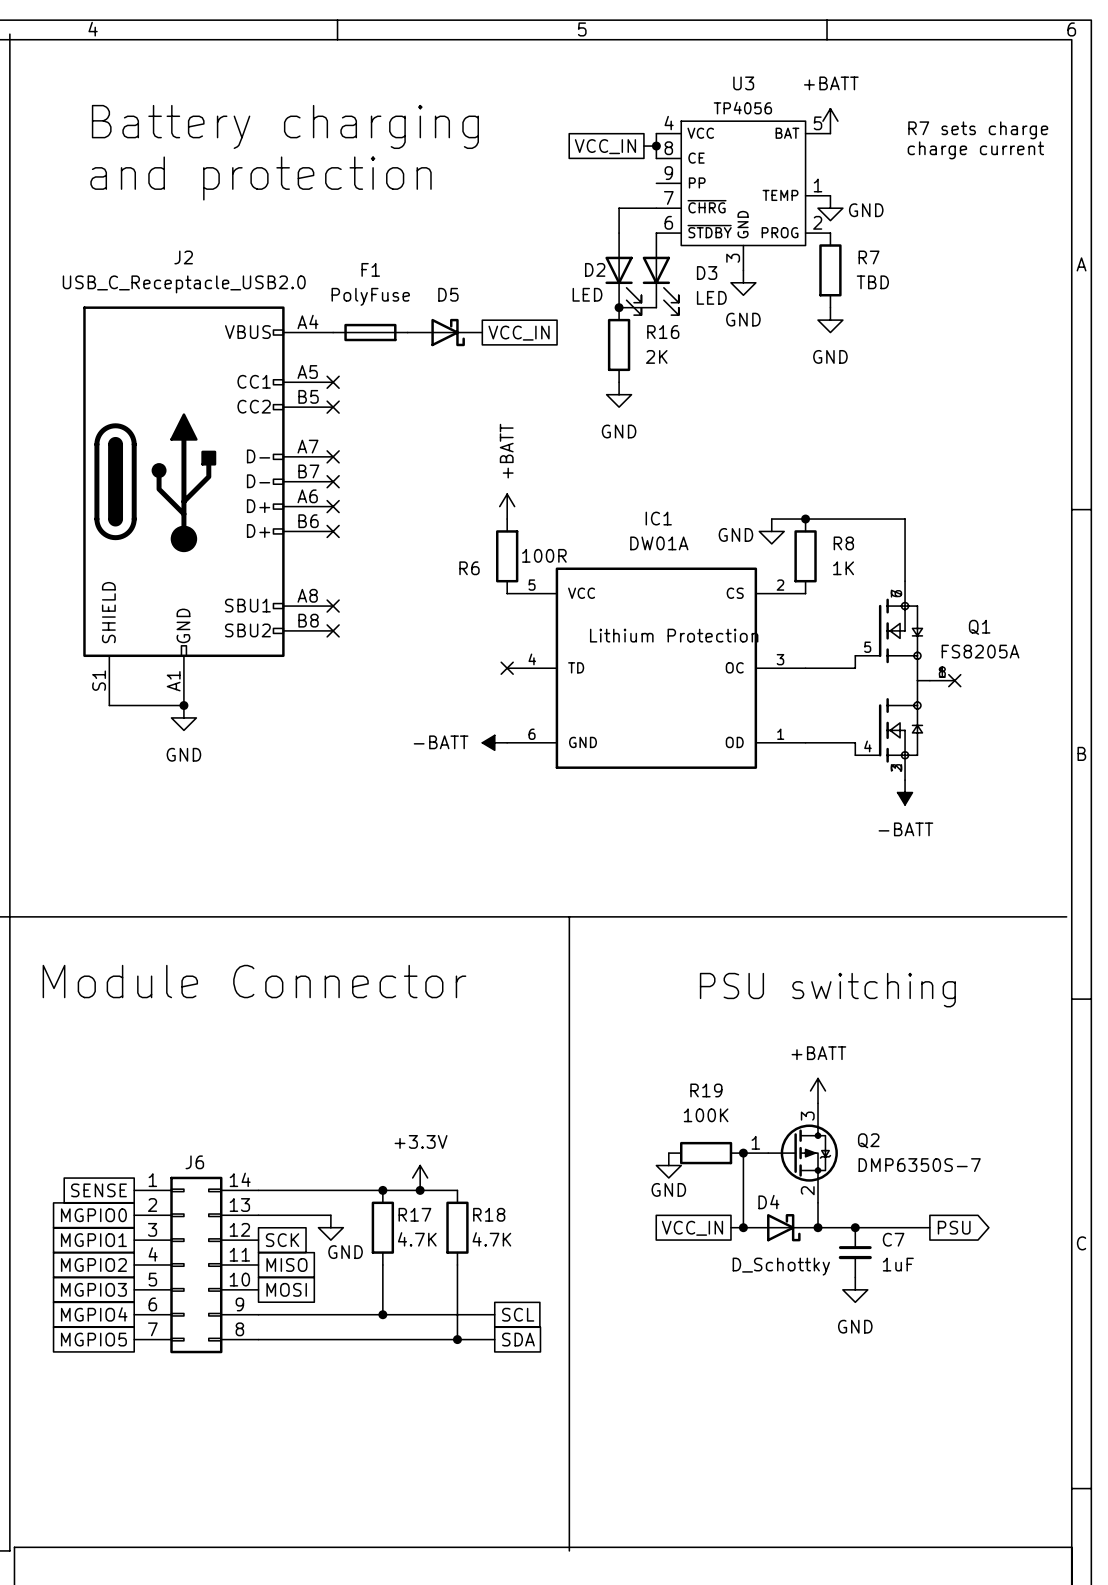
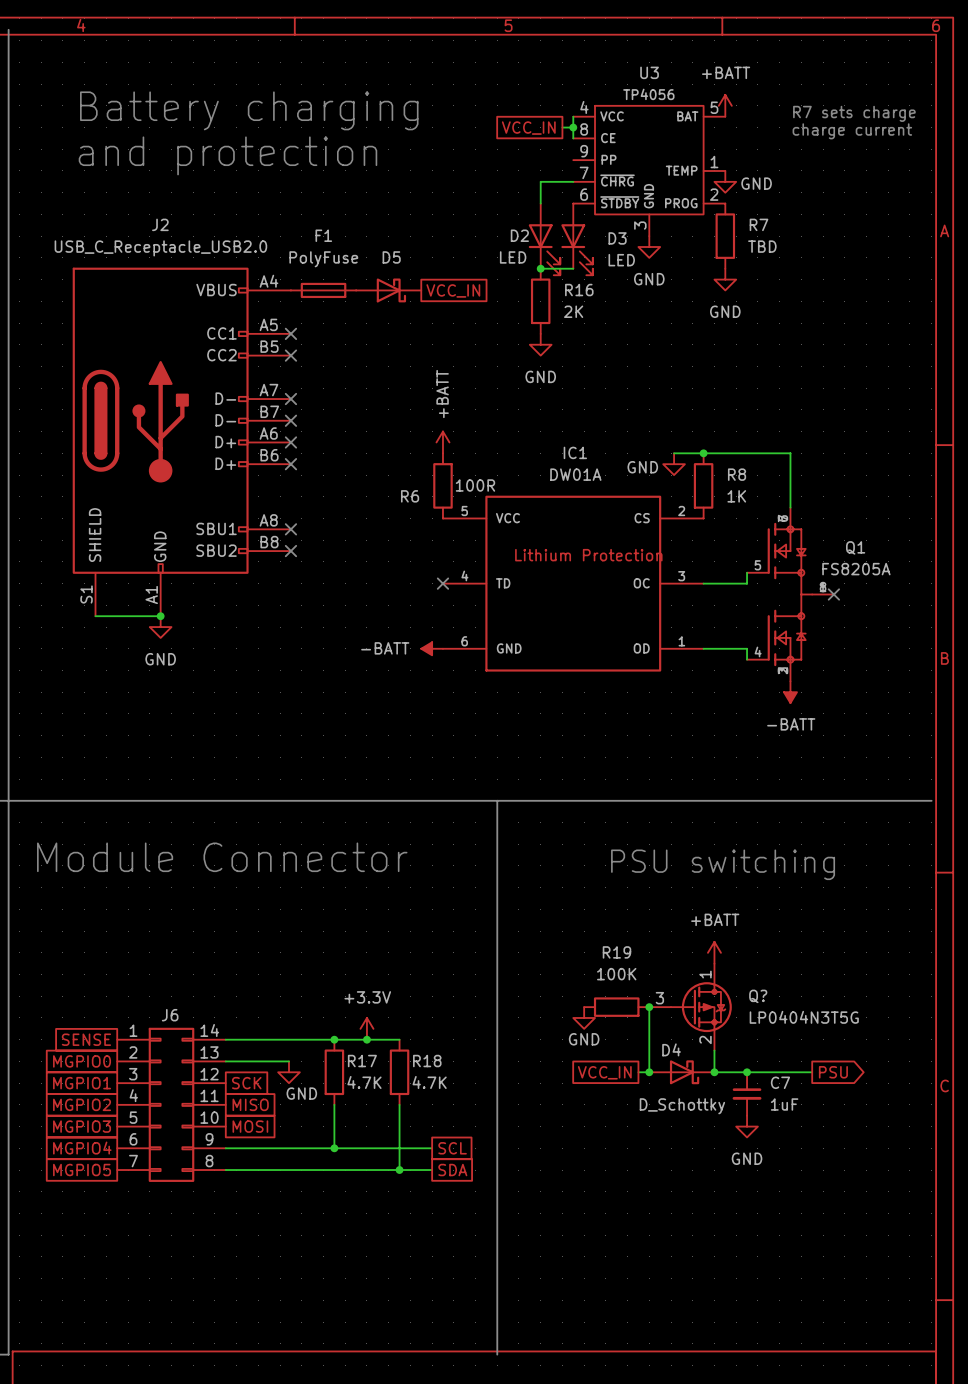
Q2 pin number: 3 (807, 1116) -> 1 (705, 974)
Q2 name: Q2 (868, 1140) -> Q? (758, 996)
Q2 pin number: 1 (755, 1142) -> 3 (659, 998)
Q2 value: DMP6350S-7 (919, 1165) -> LP0404N3T5G (804, 1017)

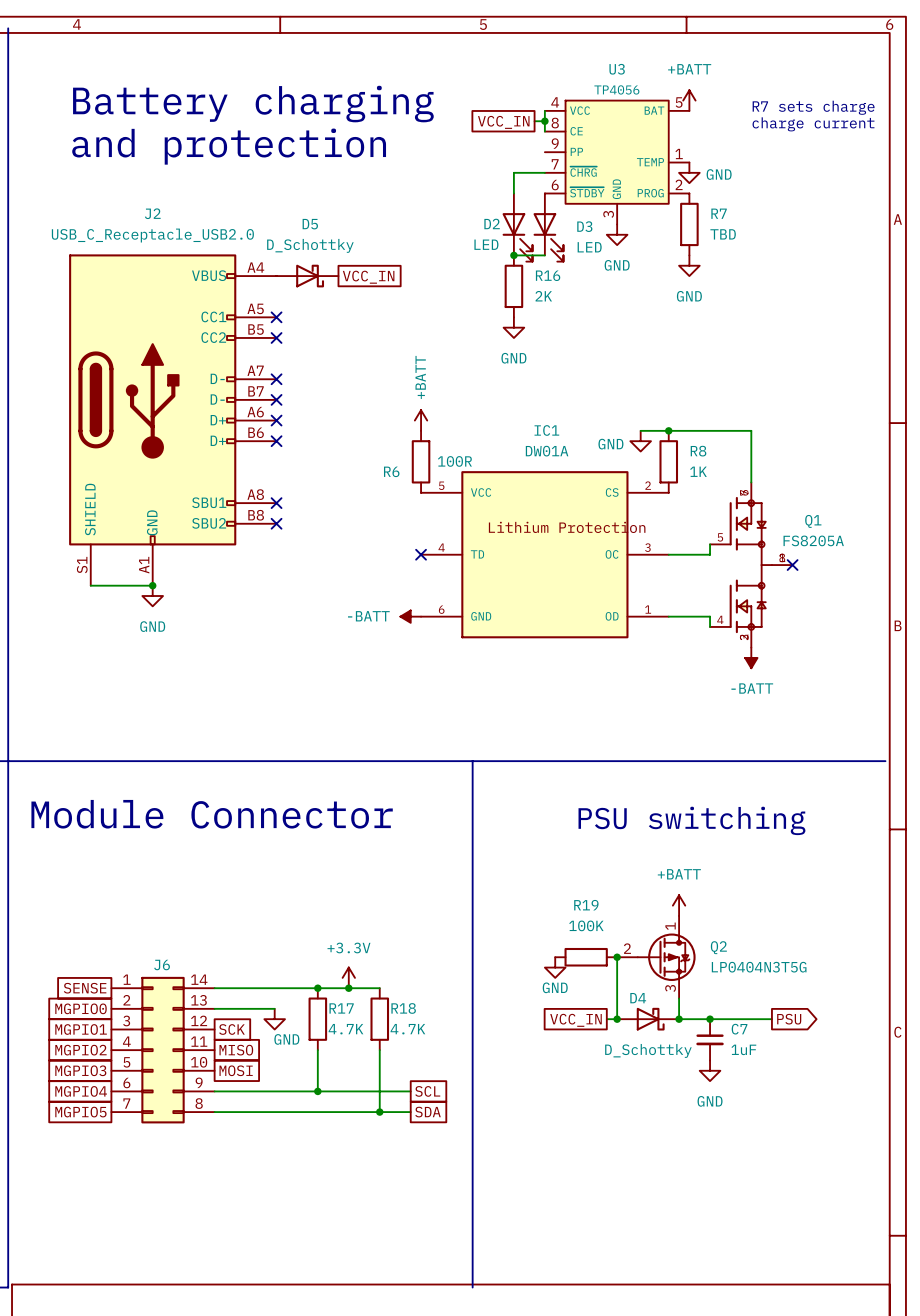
D5 name position: D5 (391, 257) -> D5 (310, 224)
D5 value: none -> D_Schottky (310, 245)
F1: PolyFuse (323, 290) -> none
D5 position: (388, 290) -> (307, 276)
global label position: VCC_IN (453, 290) -> VCC_IN (368, 277)
Q? name: Q? (758, 996) -> Q2 (718, 947)
Q? pin number: 3 (659, 998) -> 2 (627, 948)
Q? pin number: 2 (705, 1039) -> 3 (670, 988)

